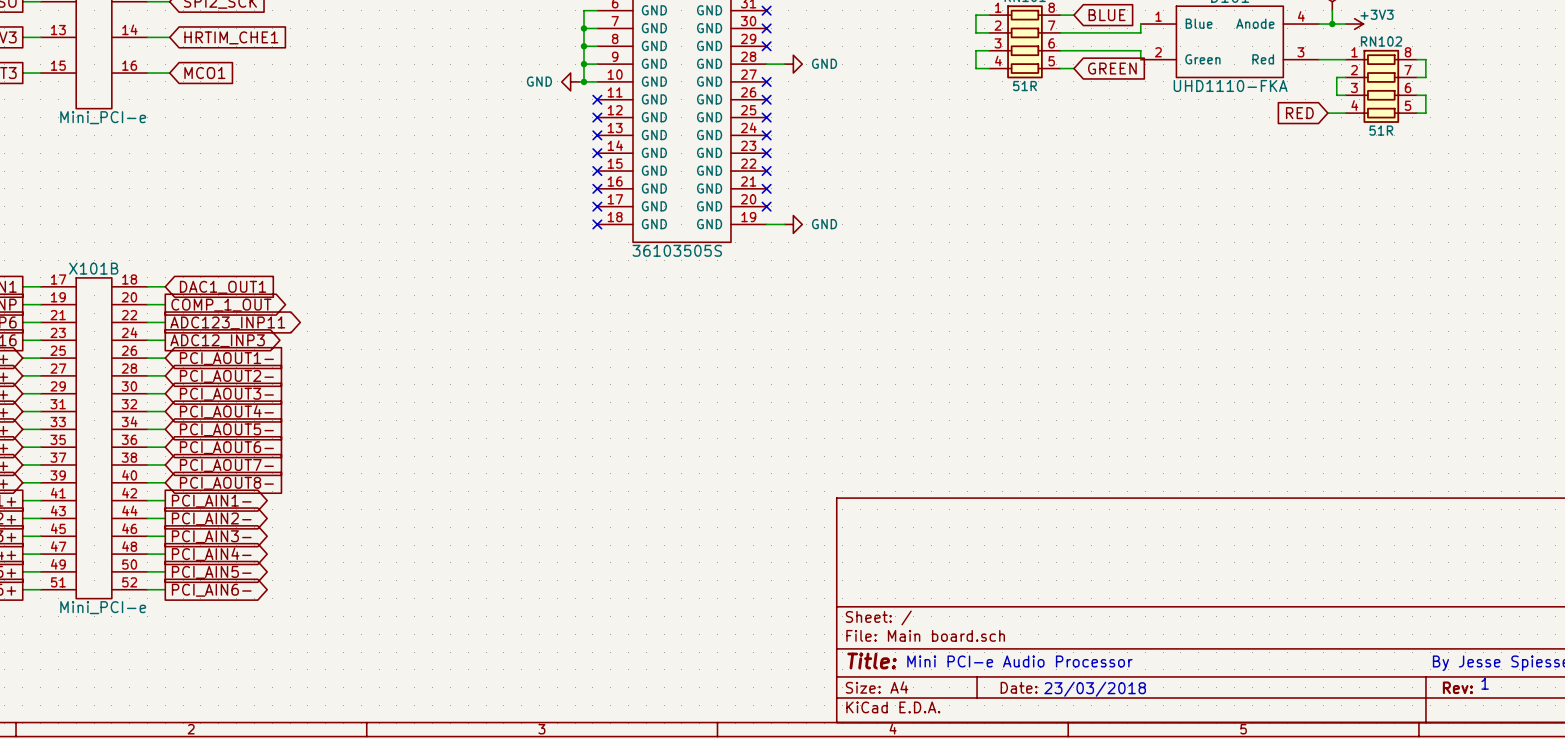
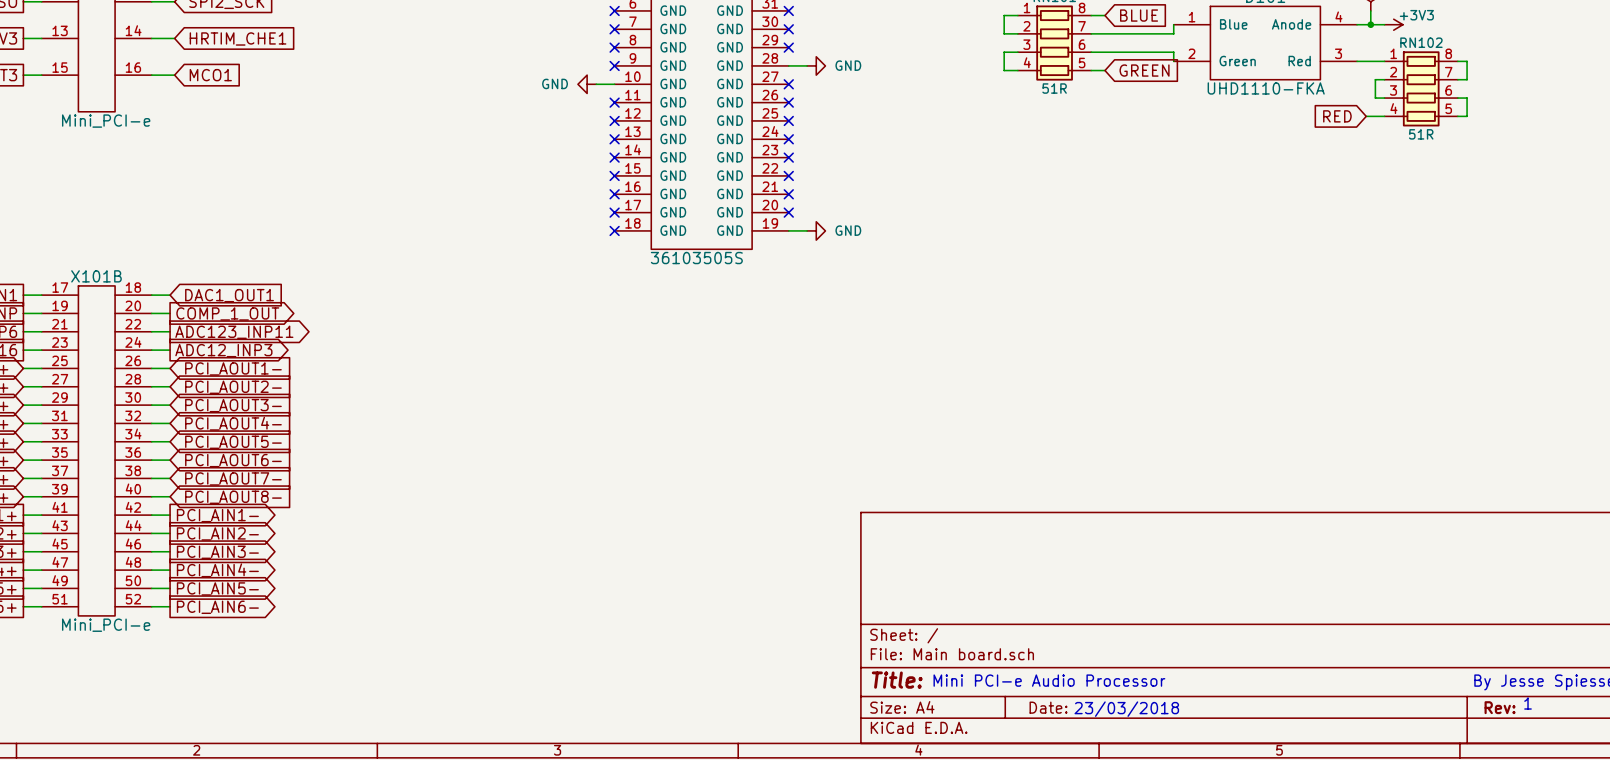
wire: (597, 10) (583, 10) (583, 81) -> none
no-connect mark: none -> (614, 10)
wire: (583, 28) (597, 28) -> none
junction: (583, 28) -> none
no-connect mark: none -> (614, 29)
wire: (583, 46) (597, 46) -> none
junction: (583, 46) -> none
no-connect mark: none -> (614, 47)
wire: (583, 64) (597, 64) -> none
junction: (583, 64) -> none
no-connect mark: none -> (614, 65)
junction: (583, 81) -> none

